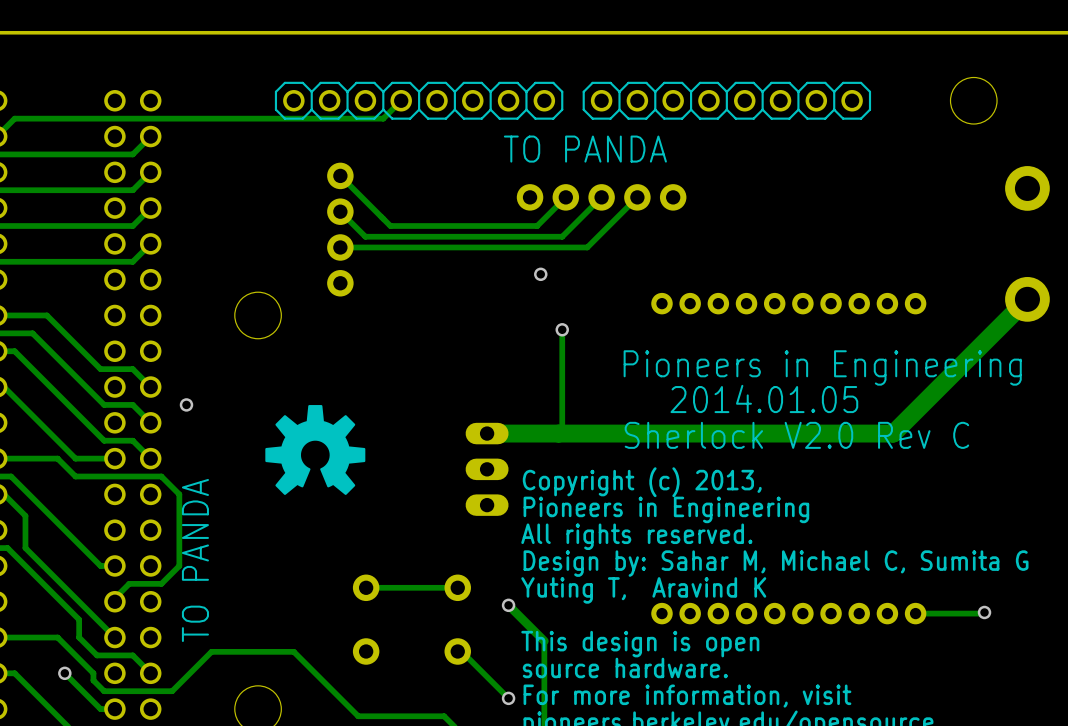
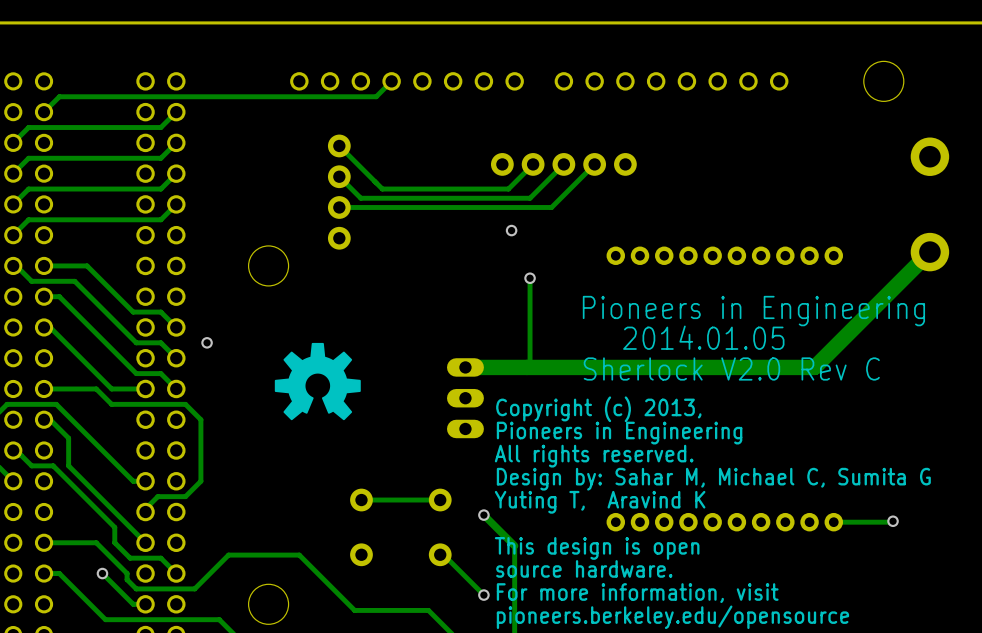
part side: bottom (419, 100) -> top (407, 81)
part side: bottom (726, 100) -> top (671, 81)
text: TO PANDA (585, 149) -> none
text: TO PANDA (195, 560) -> none

